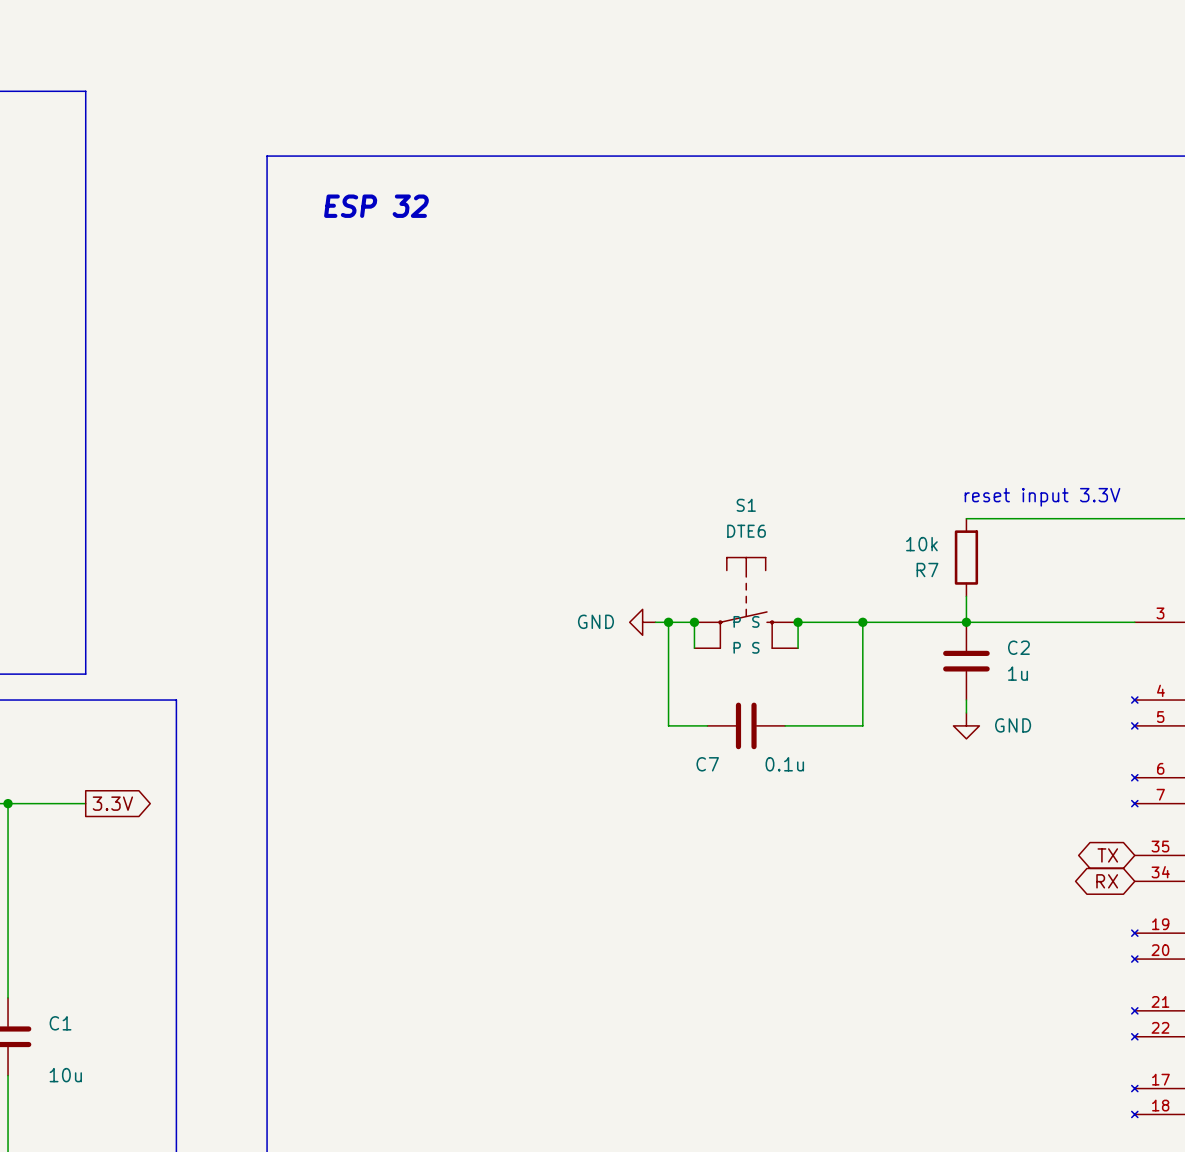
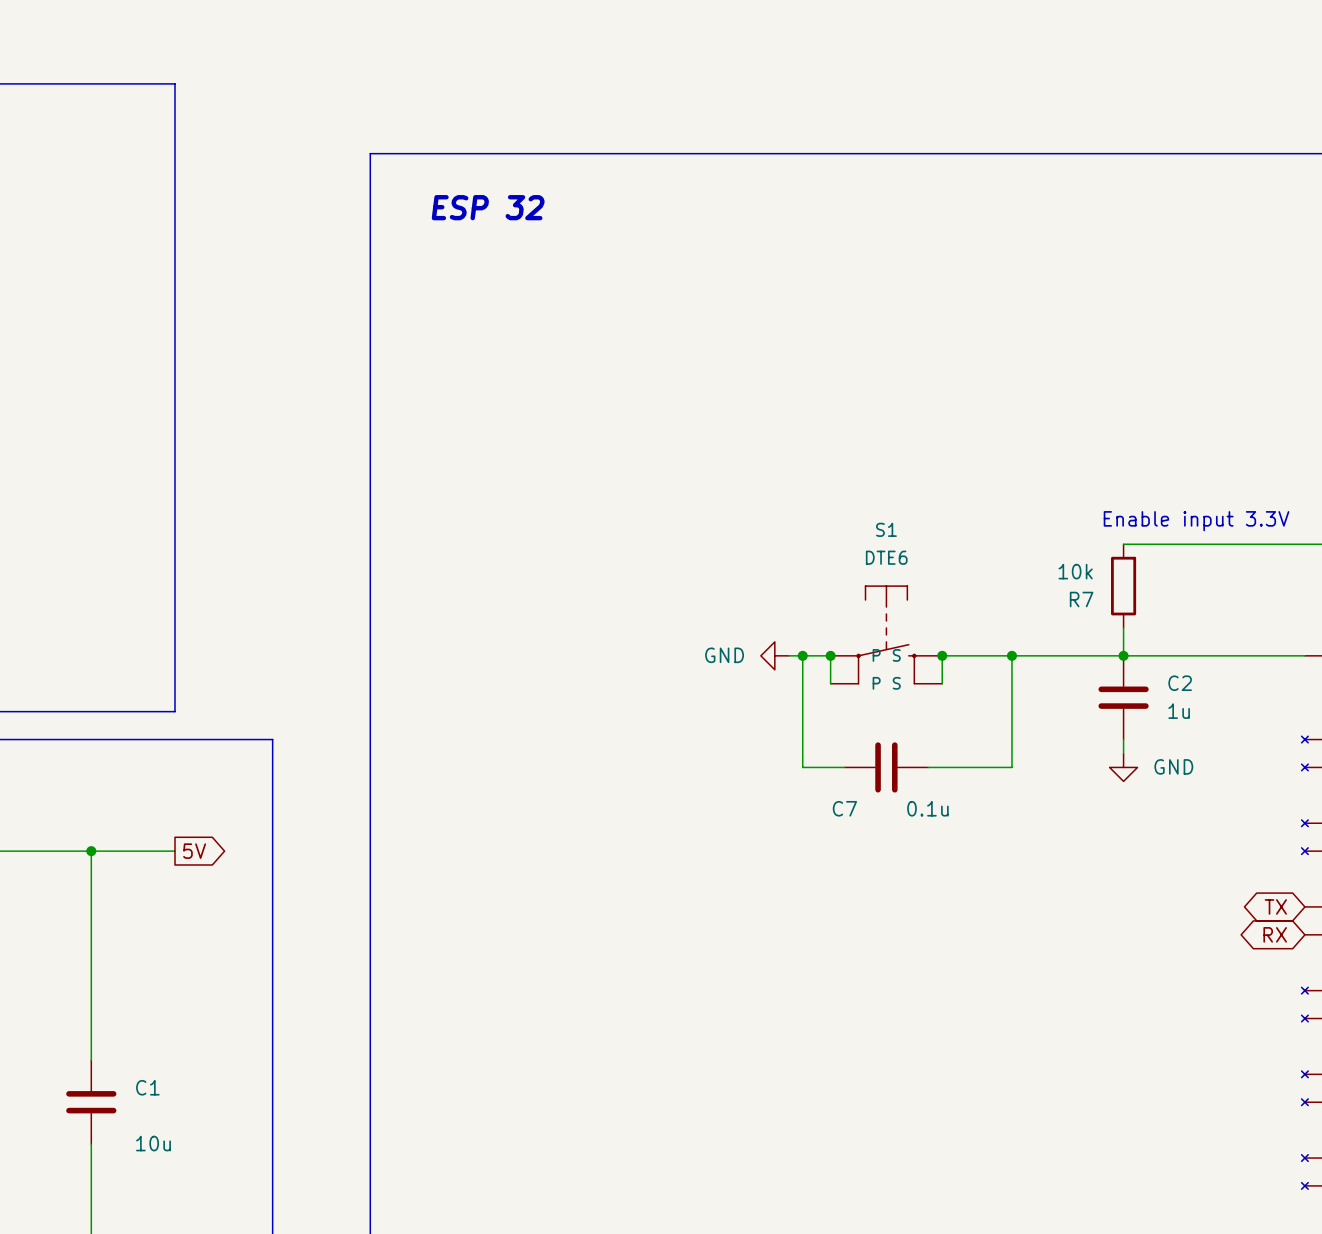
text: reset input 3.3V (1042, 497) -> Enable input 3.3V (1196, 521)
global label: 3.3V (112, 803) -> 5V (194, 851)

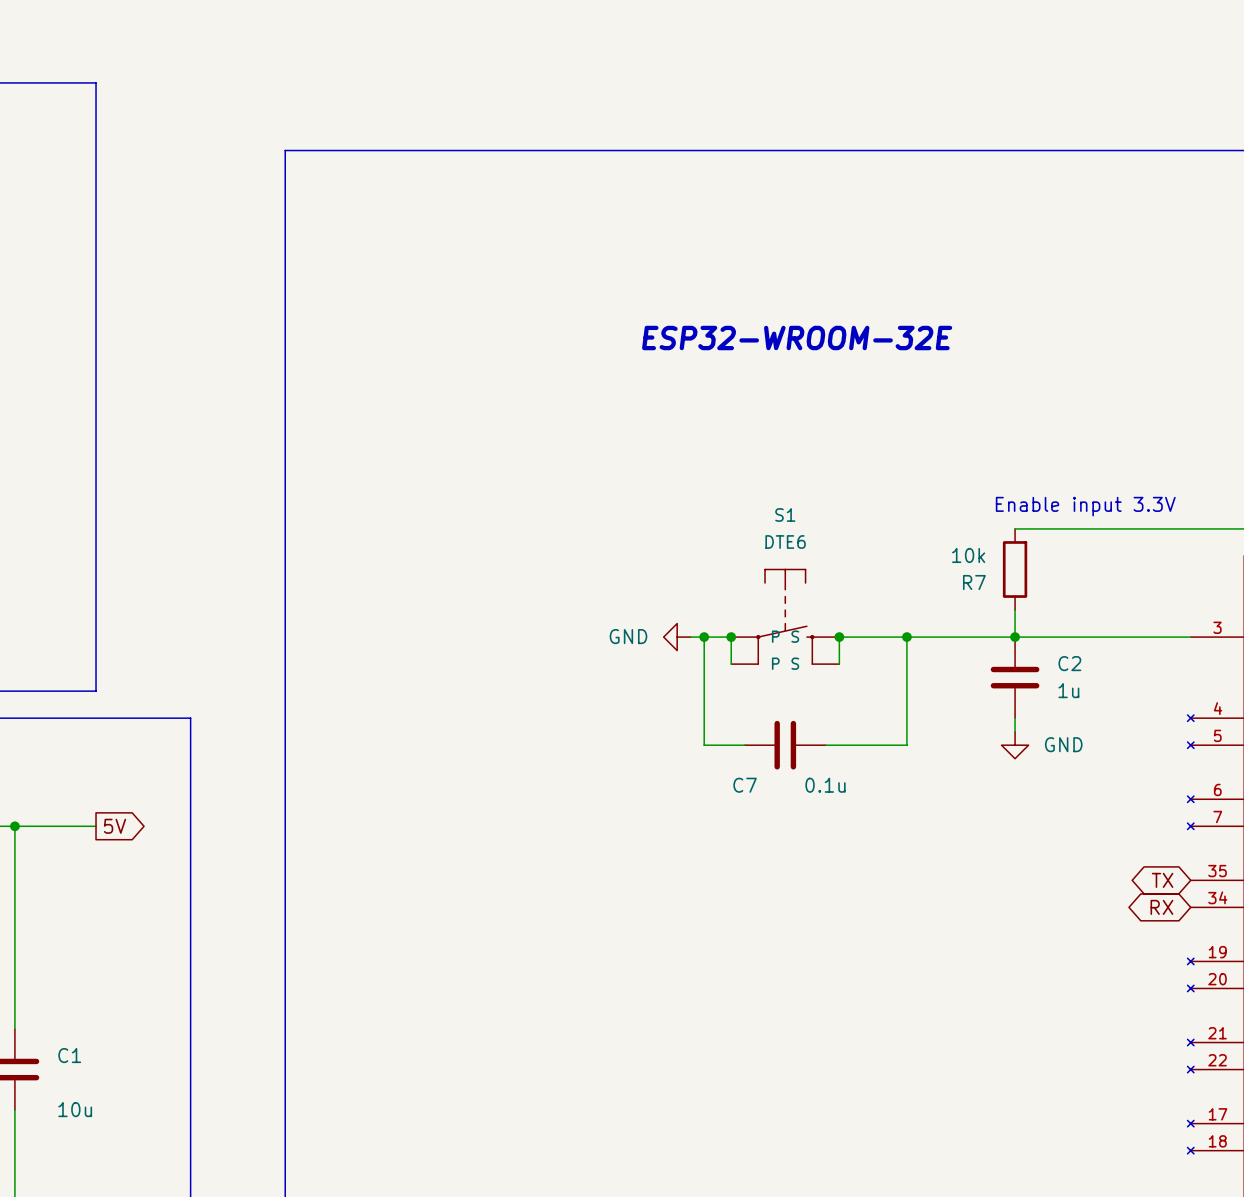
text: ESP 32 (488, 207) -> none
text: none -> ESP32-WROOM-32E (797, 338)

